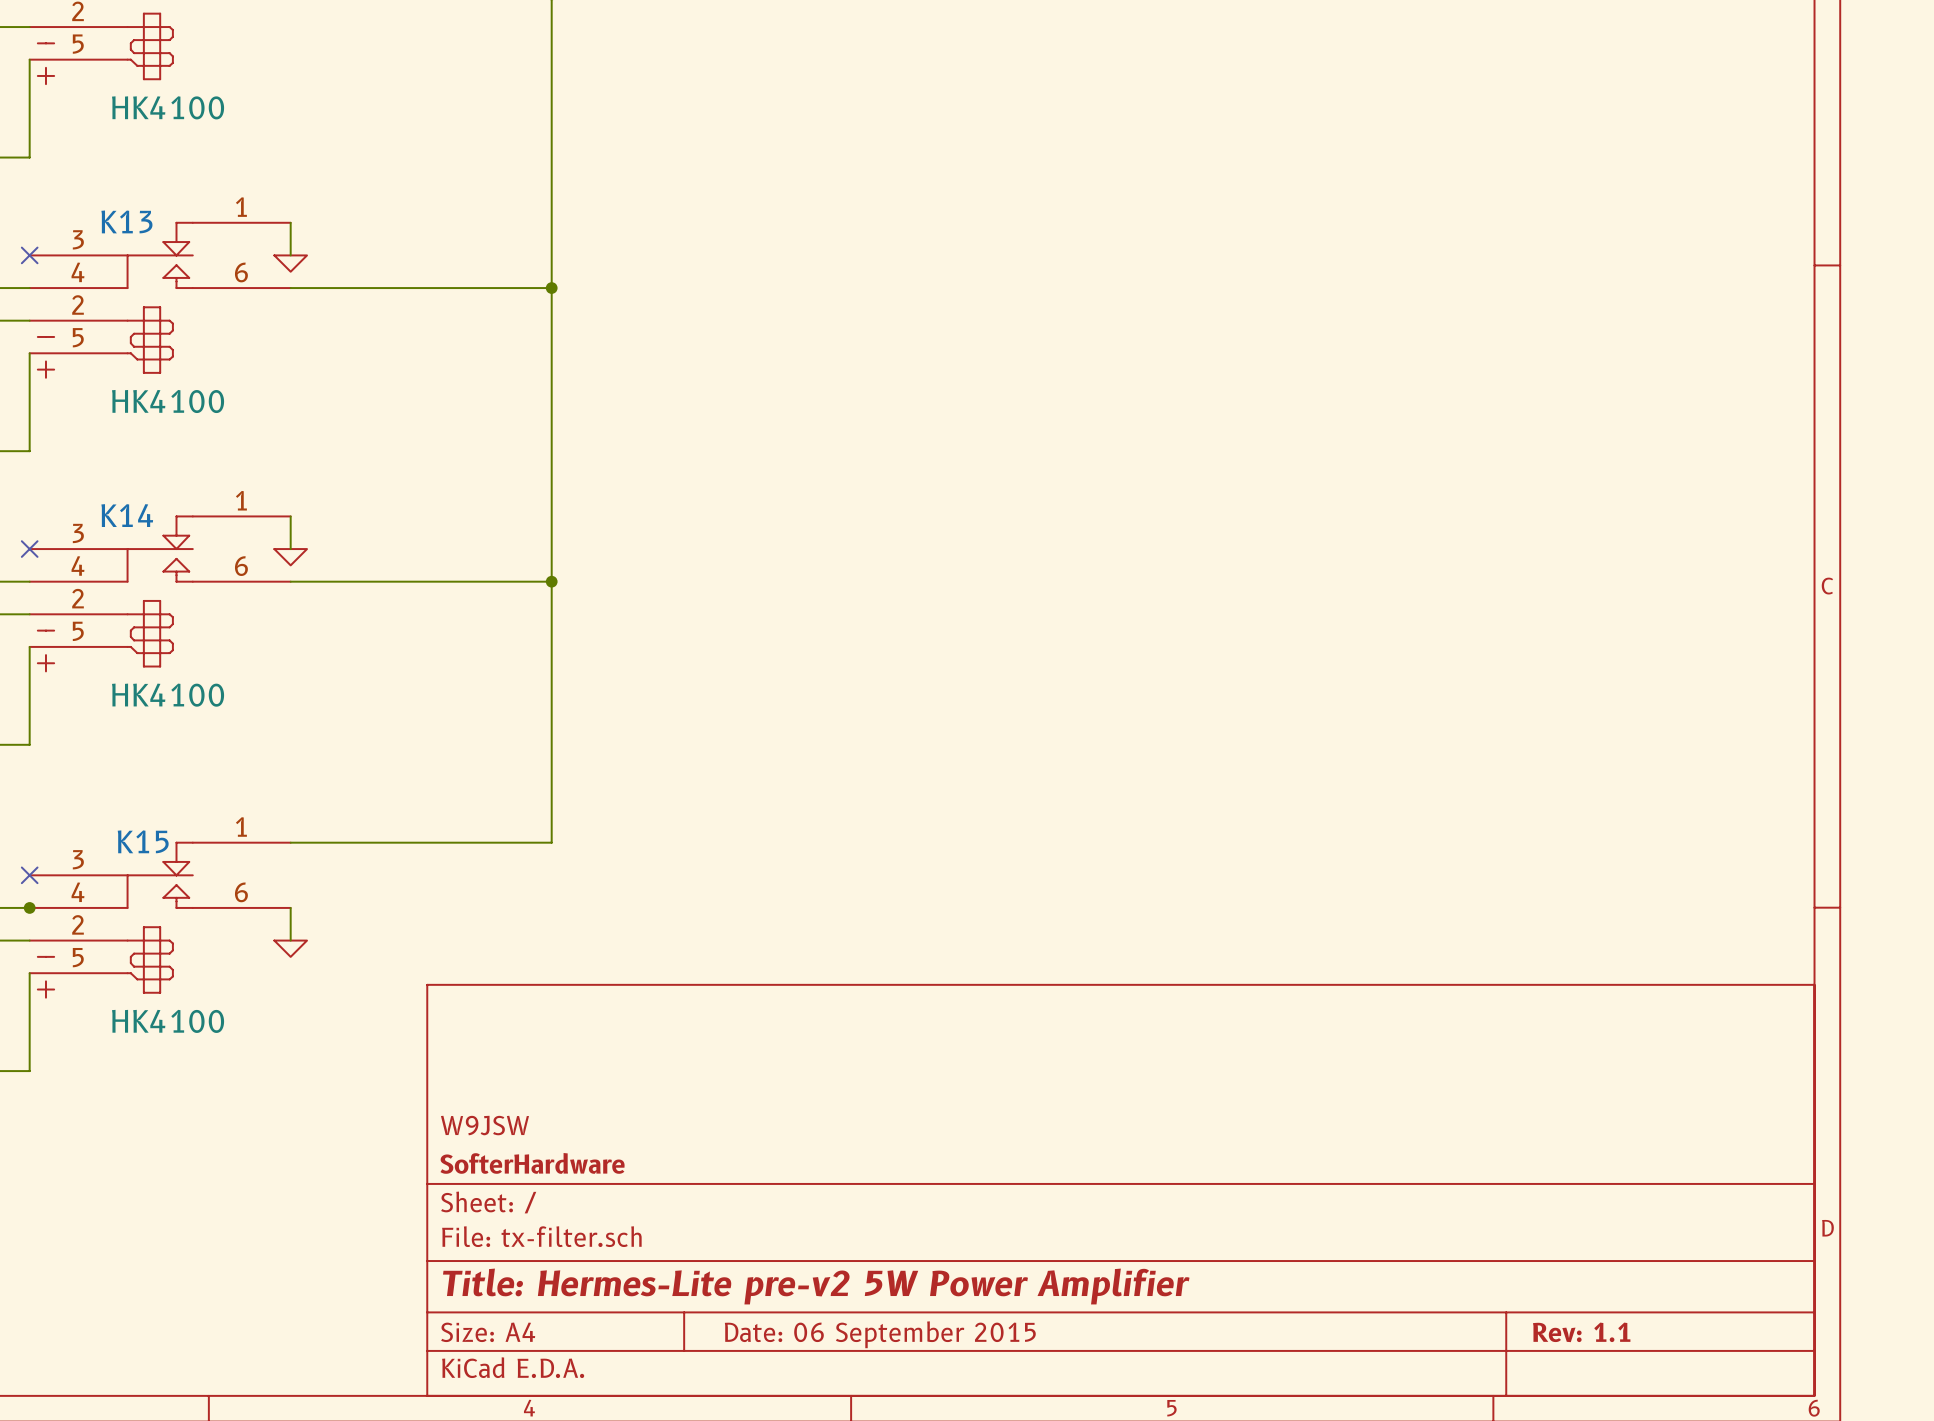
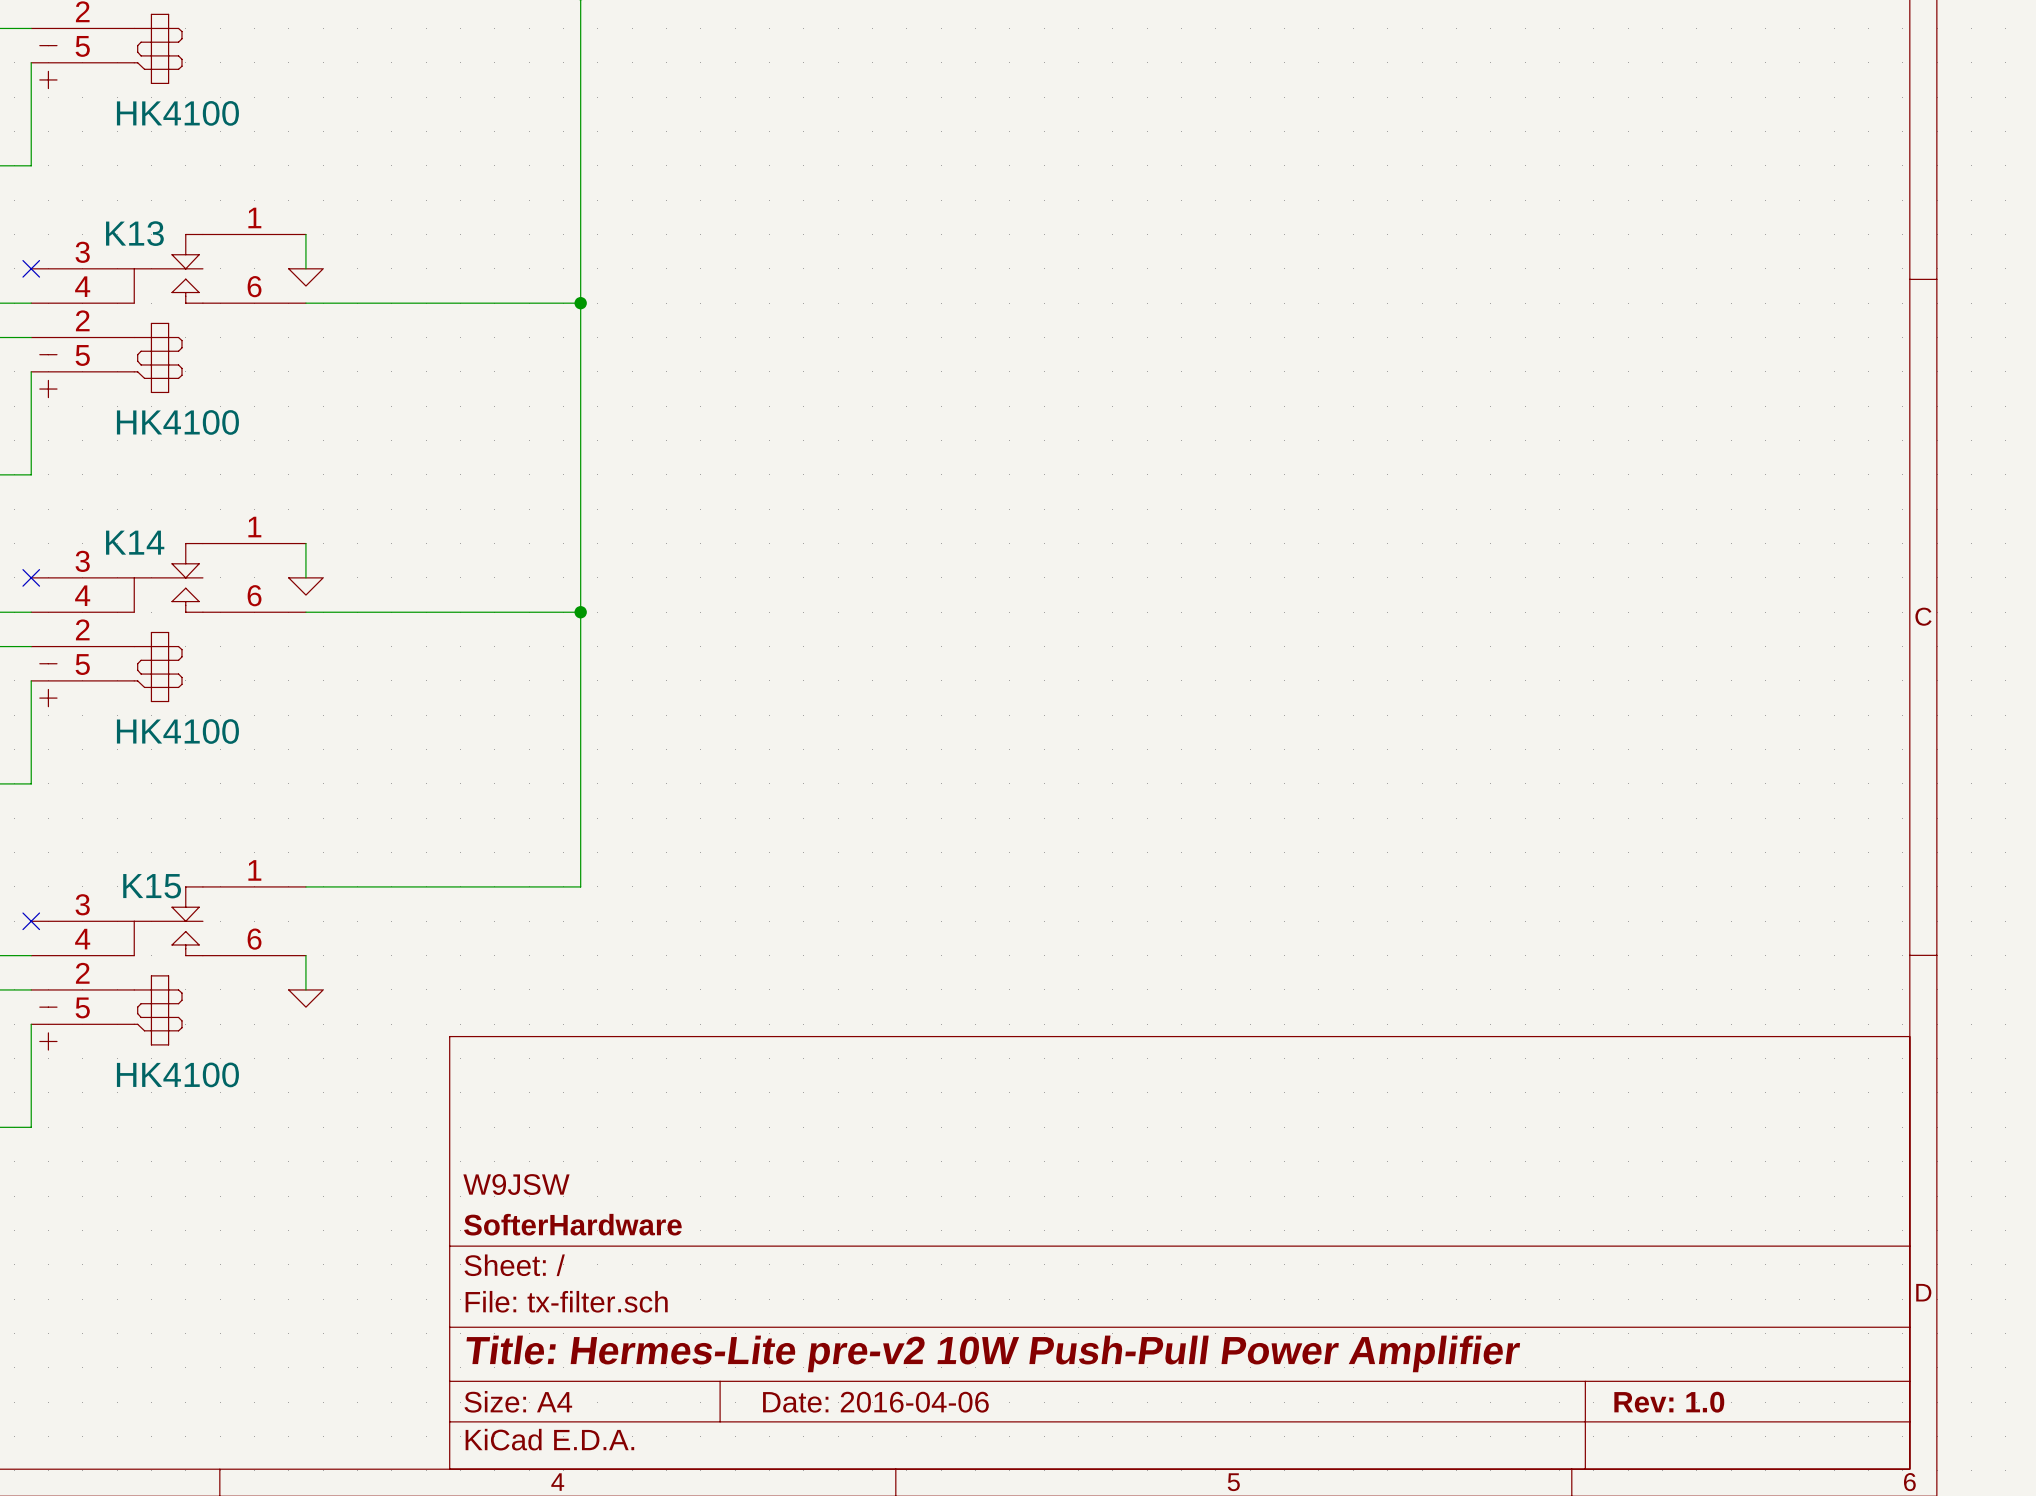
junction: (29, 907) -> none
title block: Title: Hermes-Lite pre-v2 5W Power Amplifier (816, 1286) -> Title: Hermes-Lite pre-v2 10W Push-Pull Power Amplifier (993, 1353)
title block: Rev: 1.1 (1581, 1332) -> Rev: 1.0 (1669, 1402)
title block: Date: 06 September 2015 (880, 1334) -> Date: 2016-04-06 (875, 1402)

